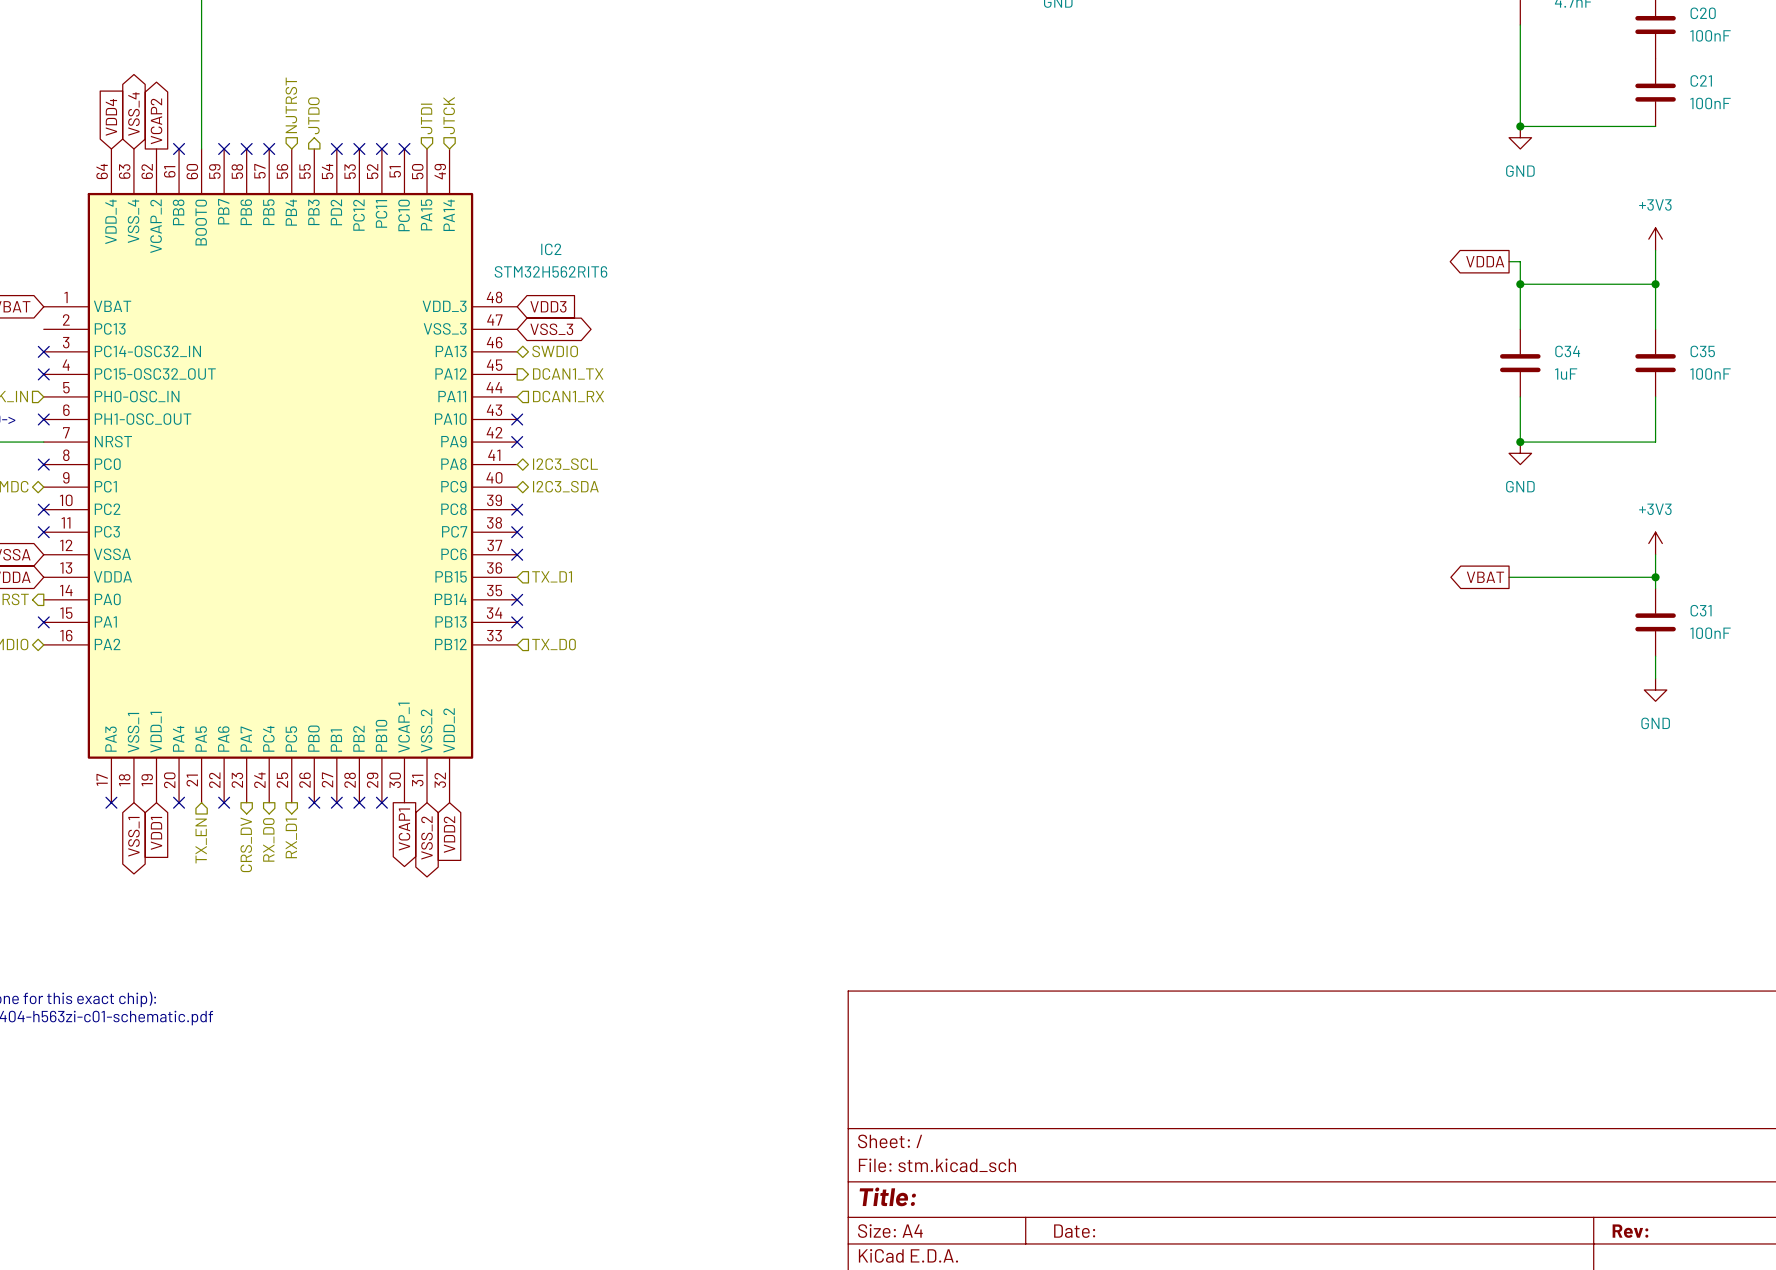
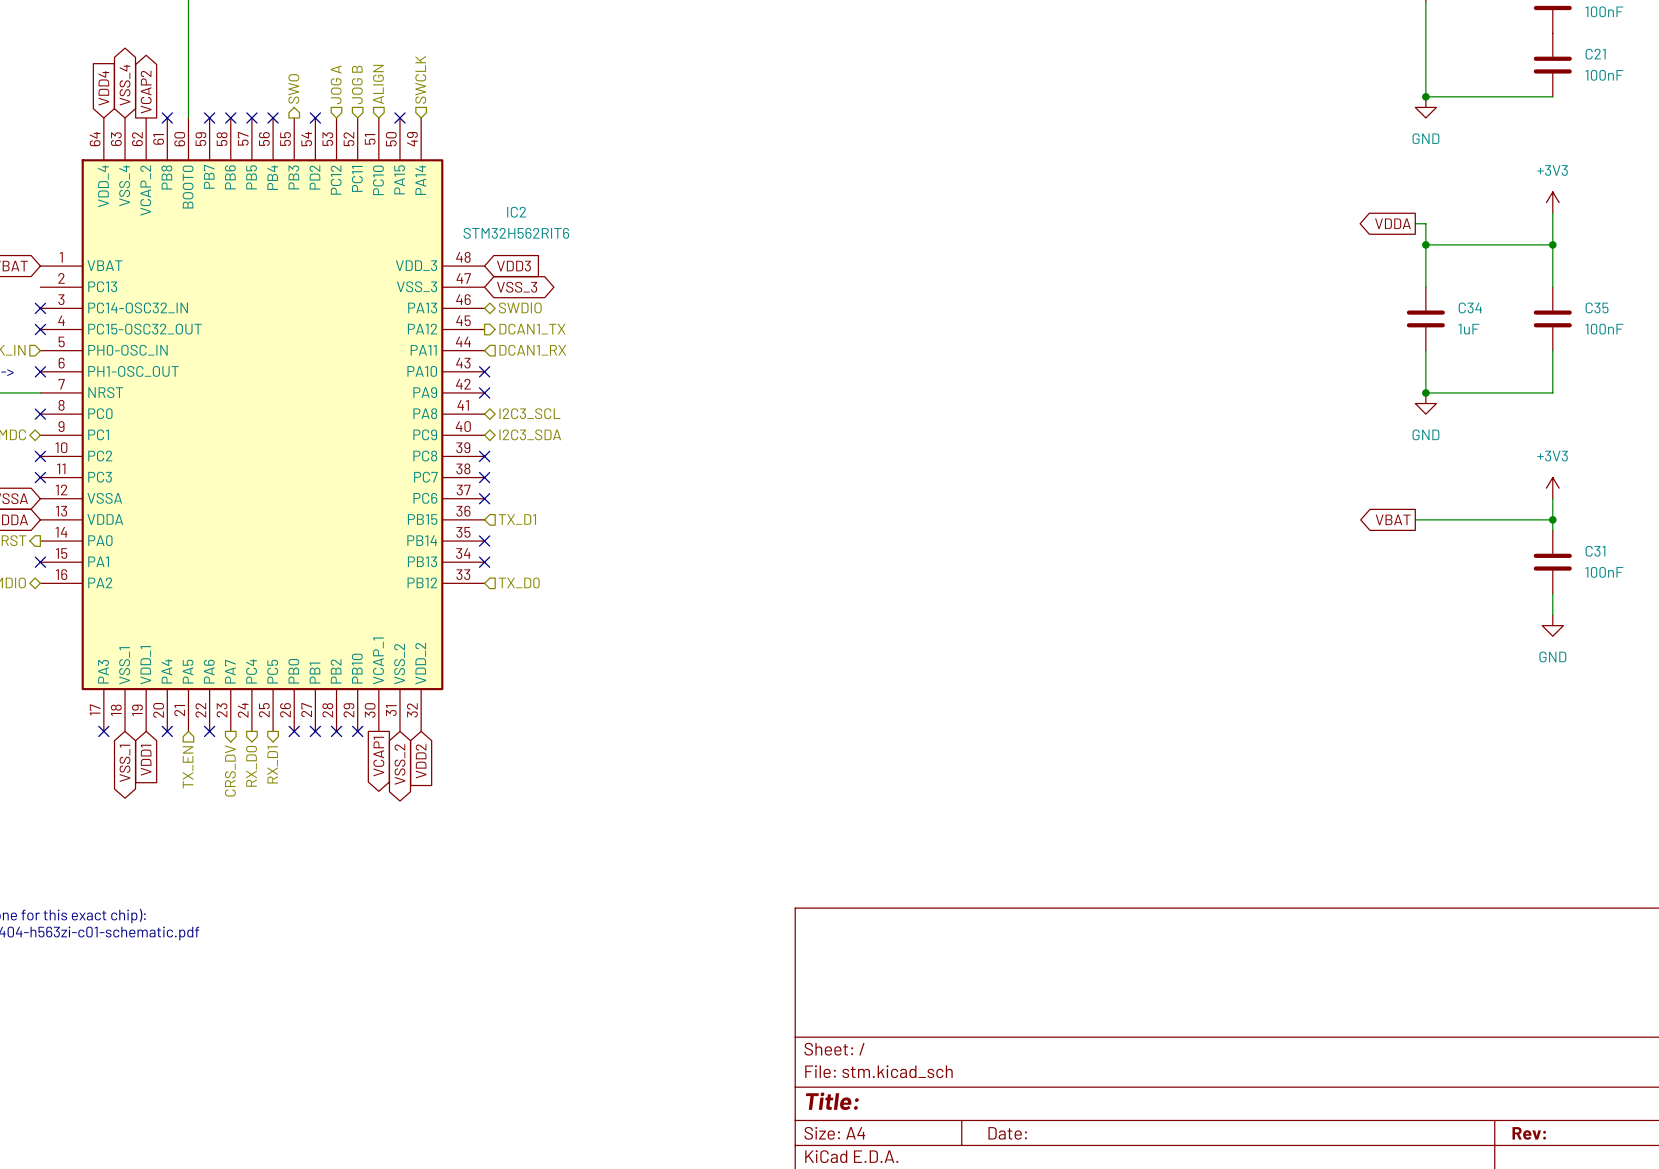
hierarchical label: NJTRST (291, 105) -> none
hierarchical label: none -> JOG A (336, 84)
hierarchical label: none -> JOG B (357, 84)
hierarchical label: none -> ALIGN (378, 84)
hierarchical label: JTDO (313, 115) -> SWO (293, 88)
hierarchical label: JTCK (449, 115) -> SWCLK (420, 79)
hierarchical label: JTDI (426, 118) -> none
no-connect mark: none -> (273, 117)
no-connect mark: (359, 148) -> none
no-connect mark: (381, 148) -> none
no-connect mark: (404, 148) -> none
no-connect mark: none -> (399, 117)

